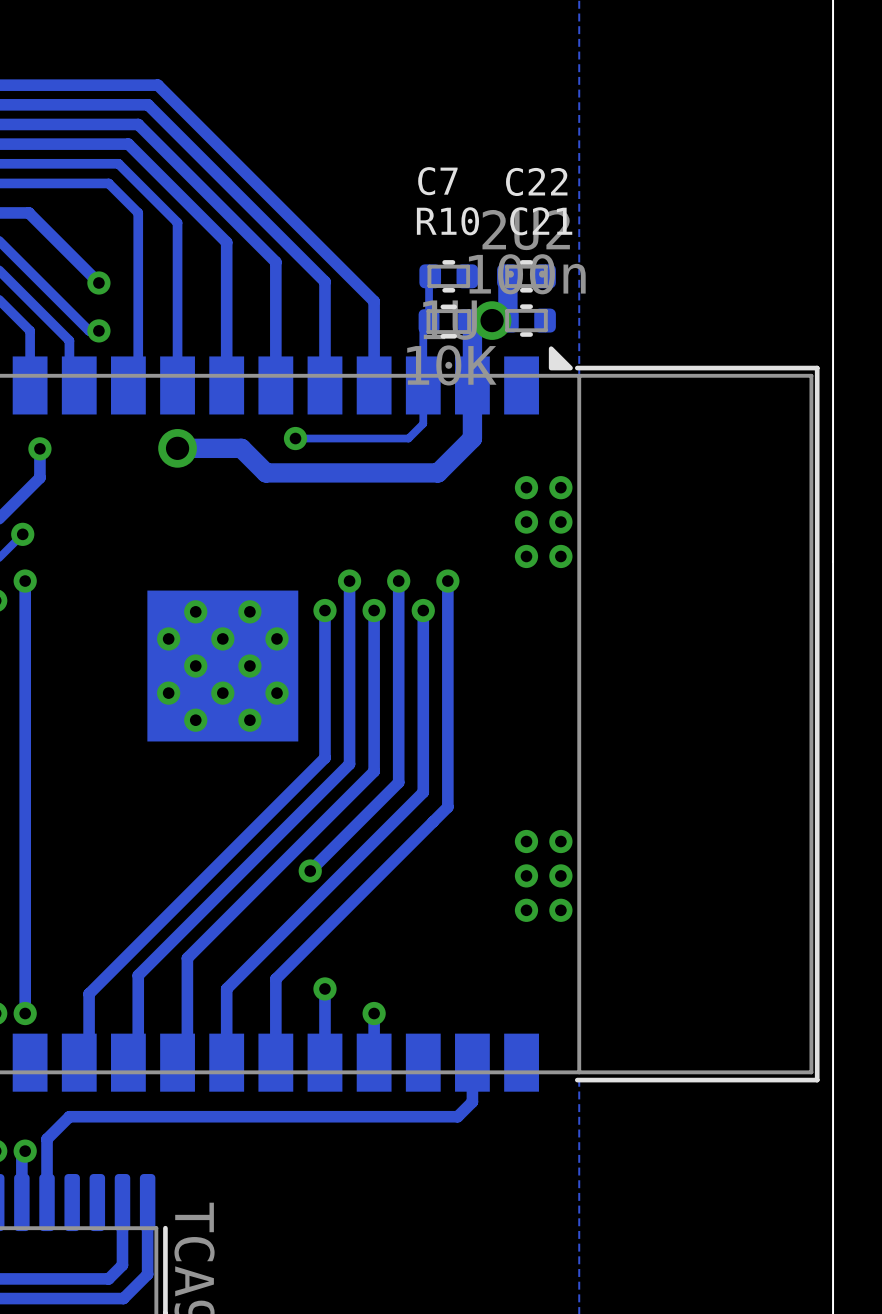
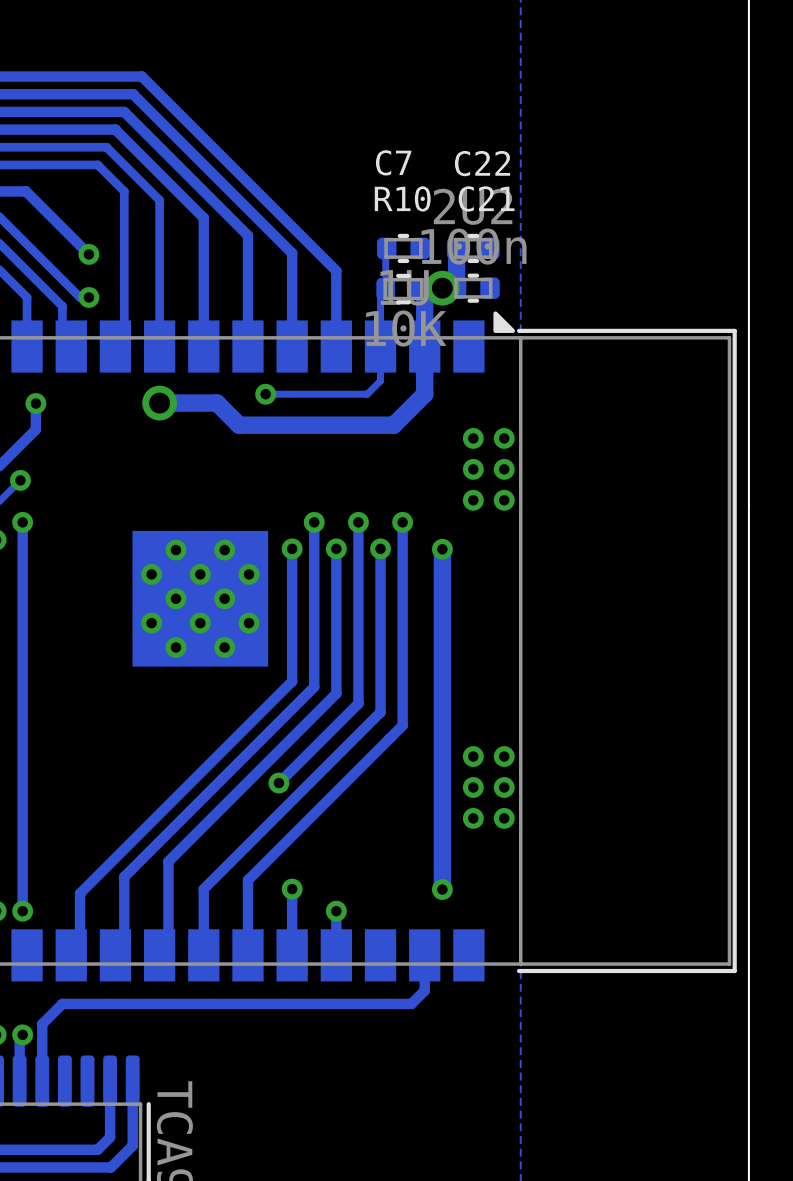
track: none -> (442, 549) (442, 889)
via: none -> (442, 549)
via: none -> (442, 889)

